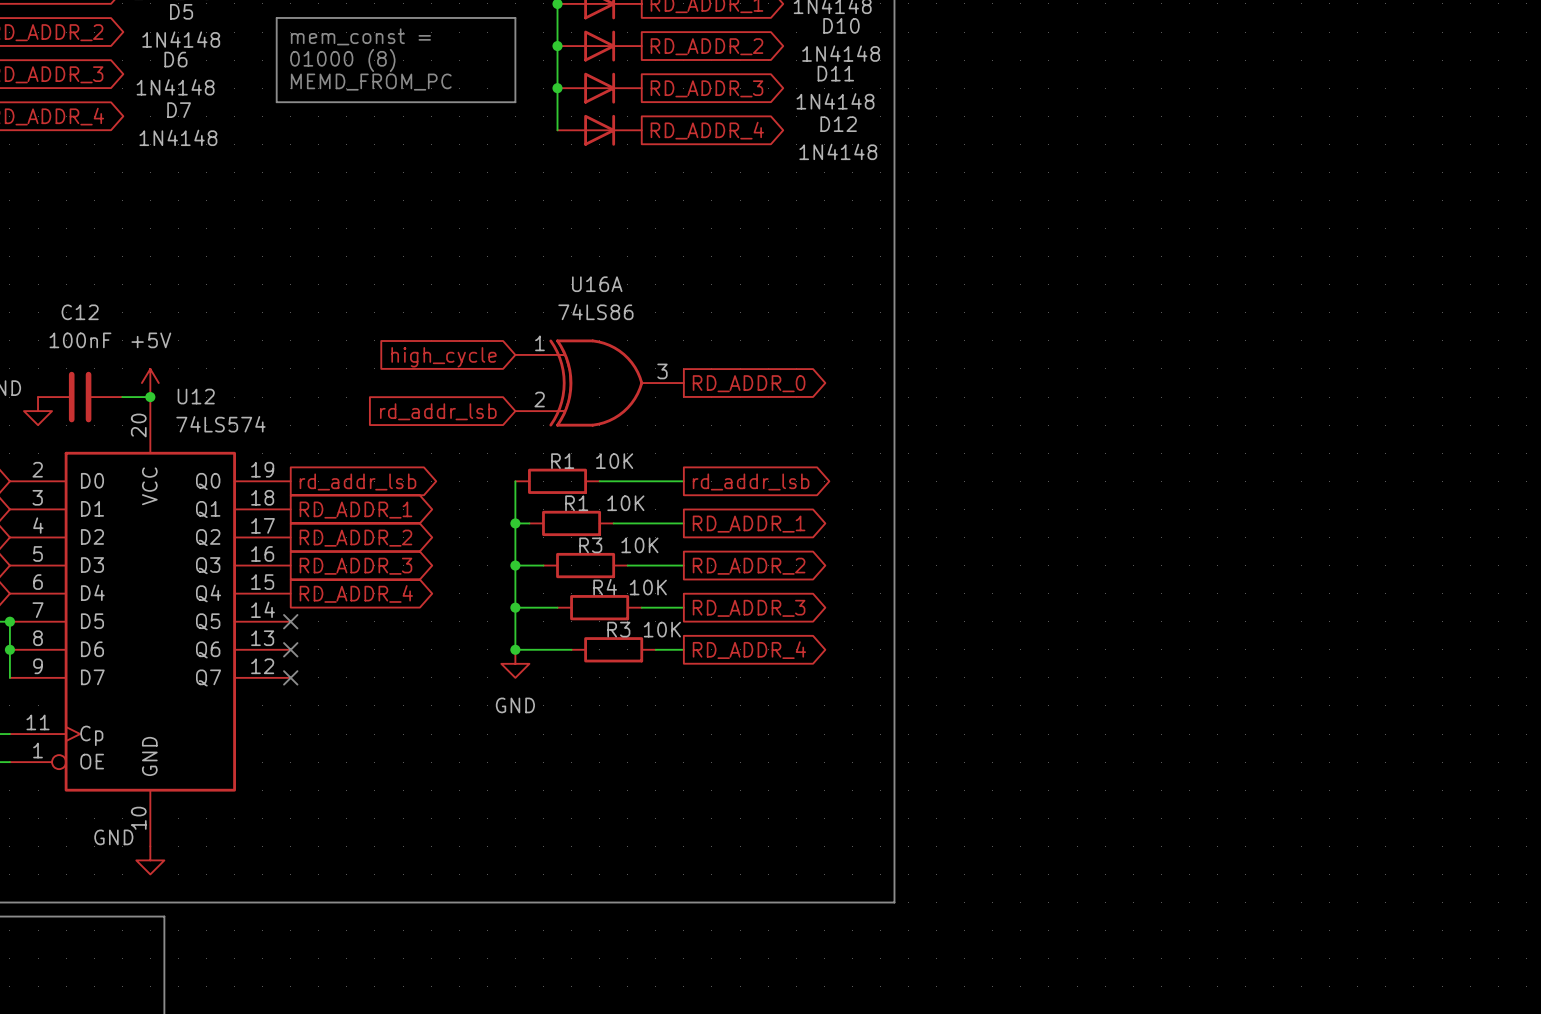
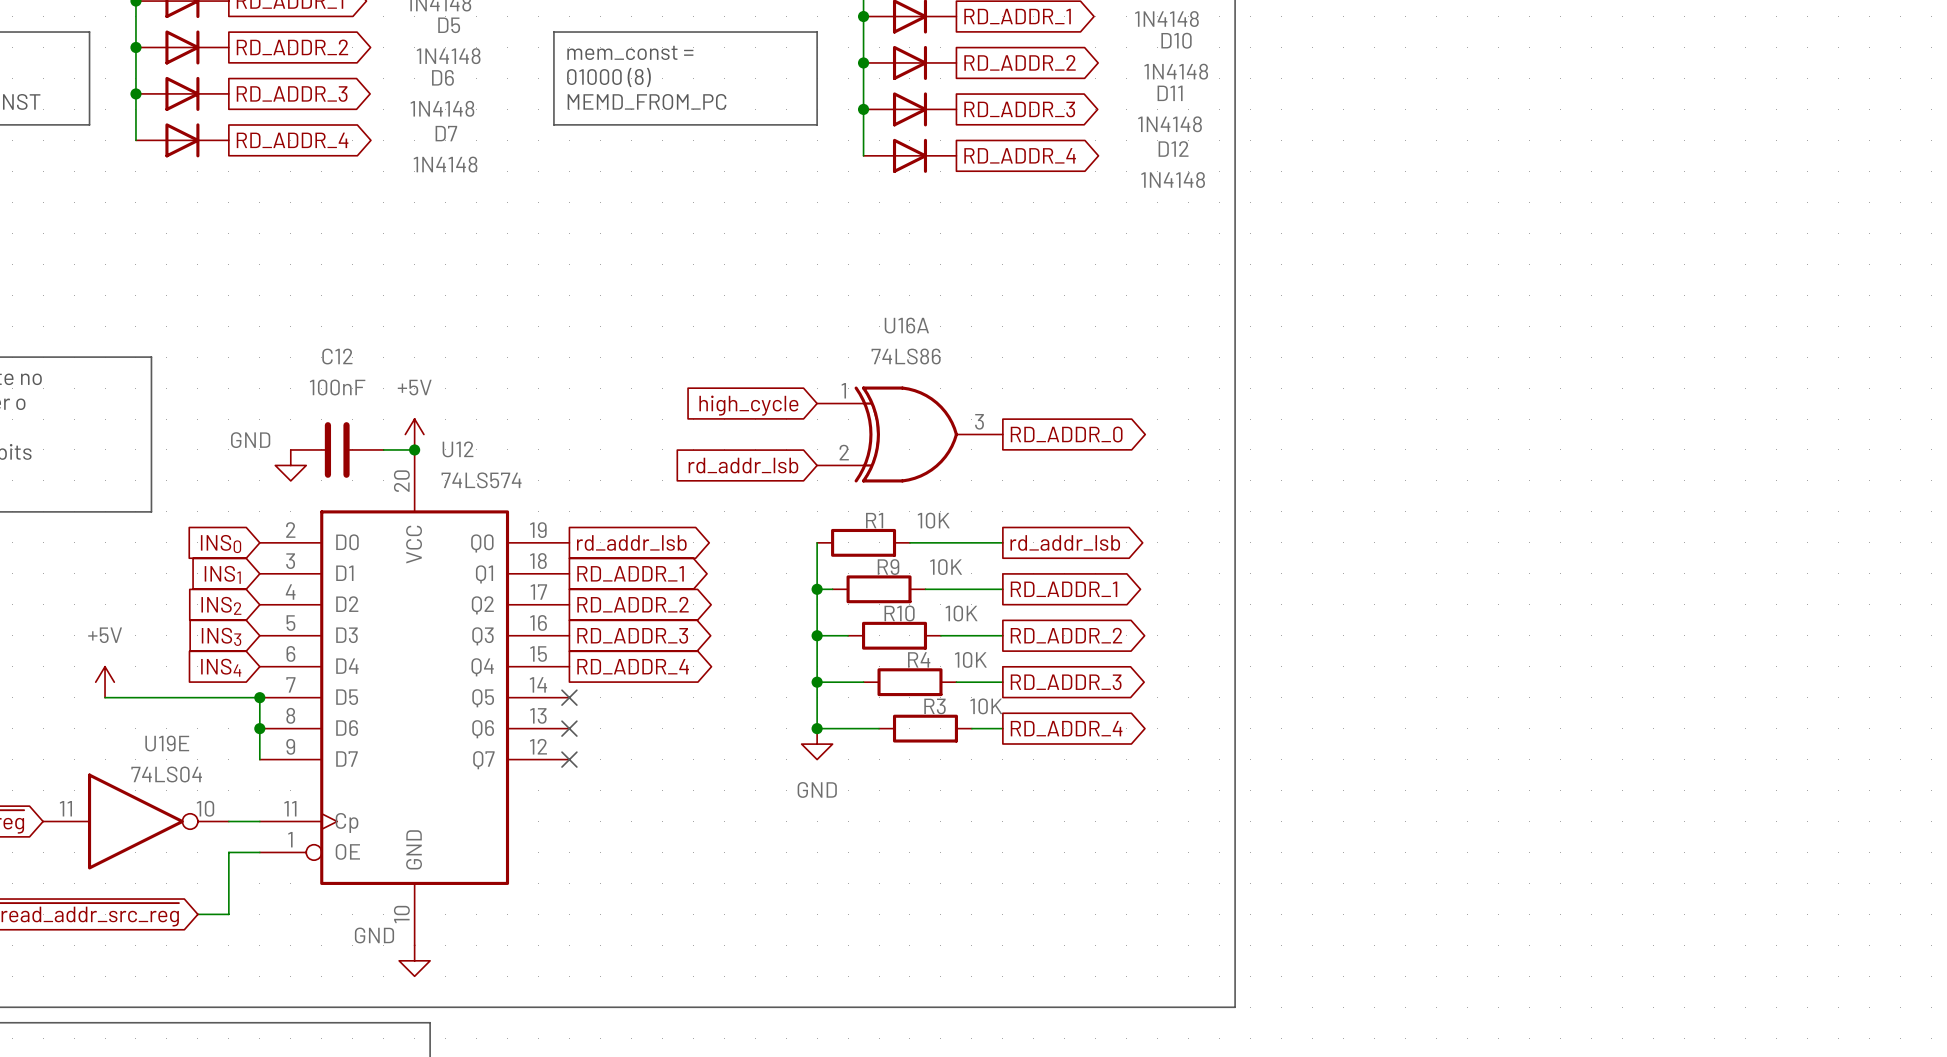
R1 name: R1 (576, 503) -> R9 (888, 567)
R3 name: R3 (590, 545) -> R10 (899, 613)

